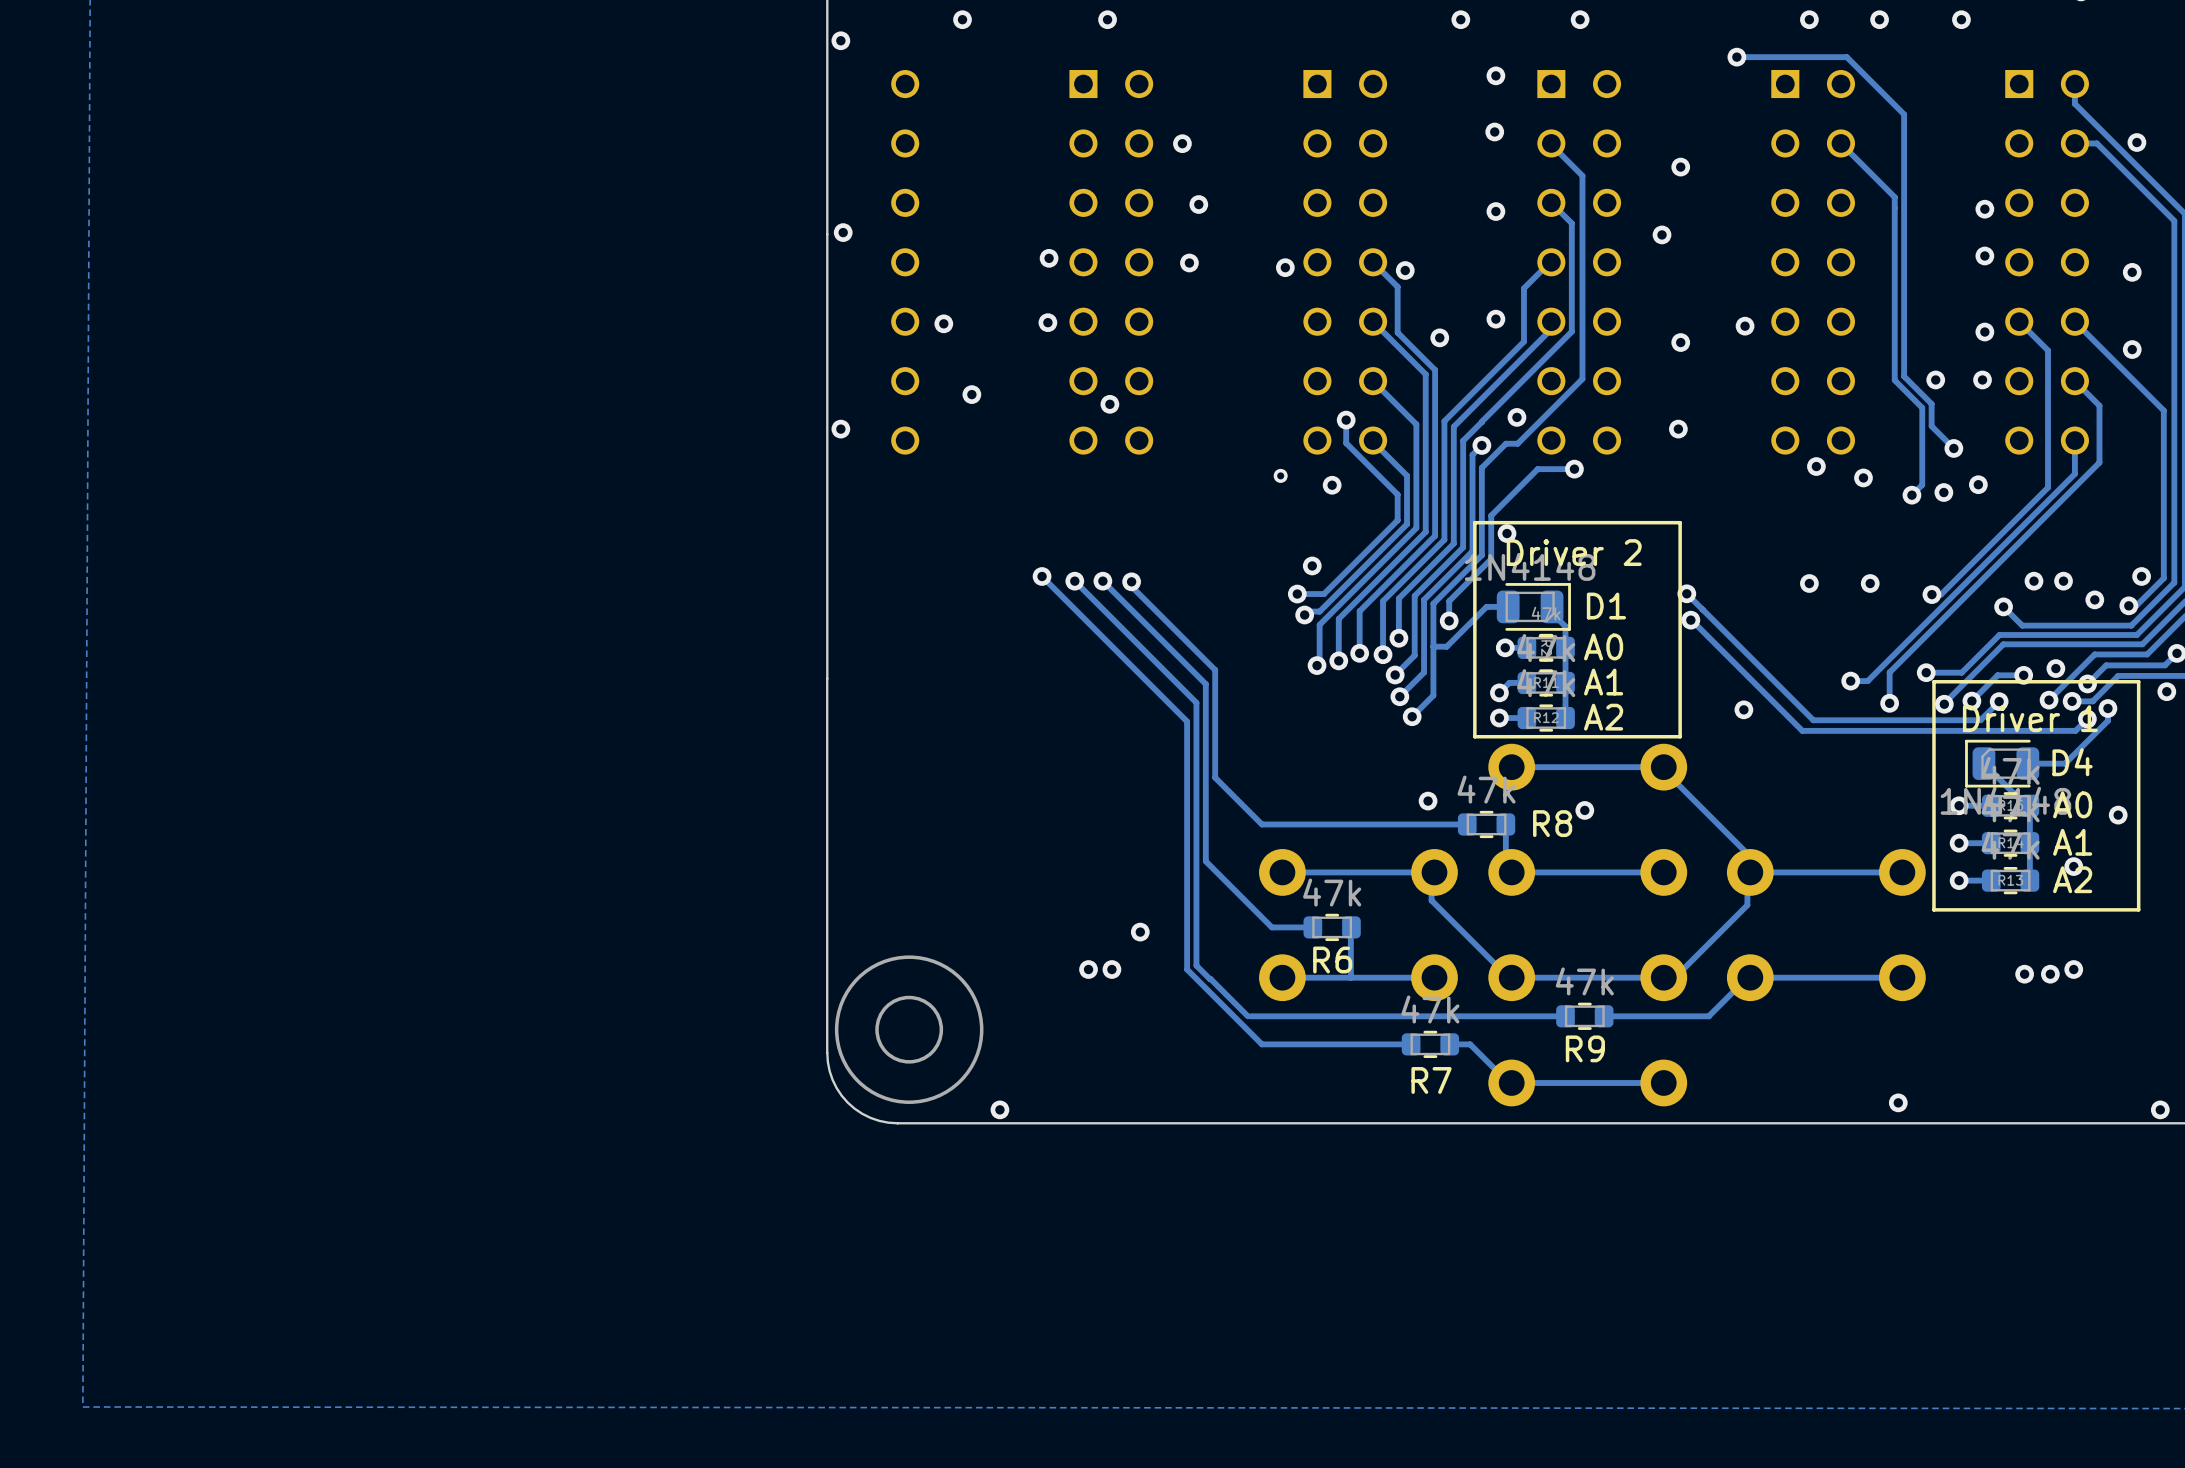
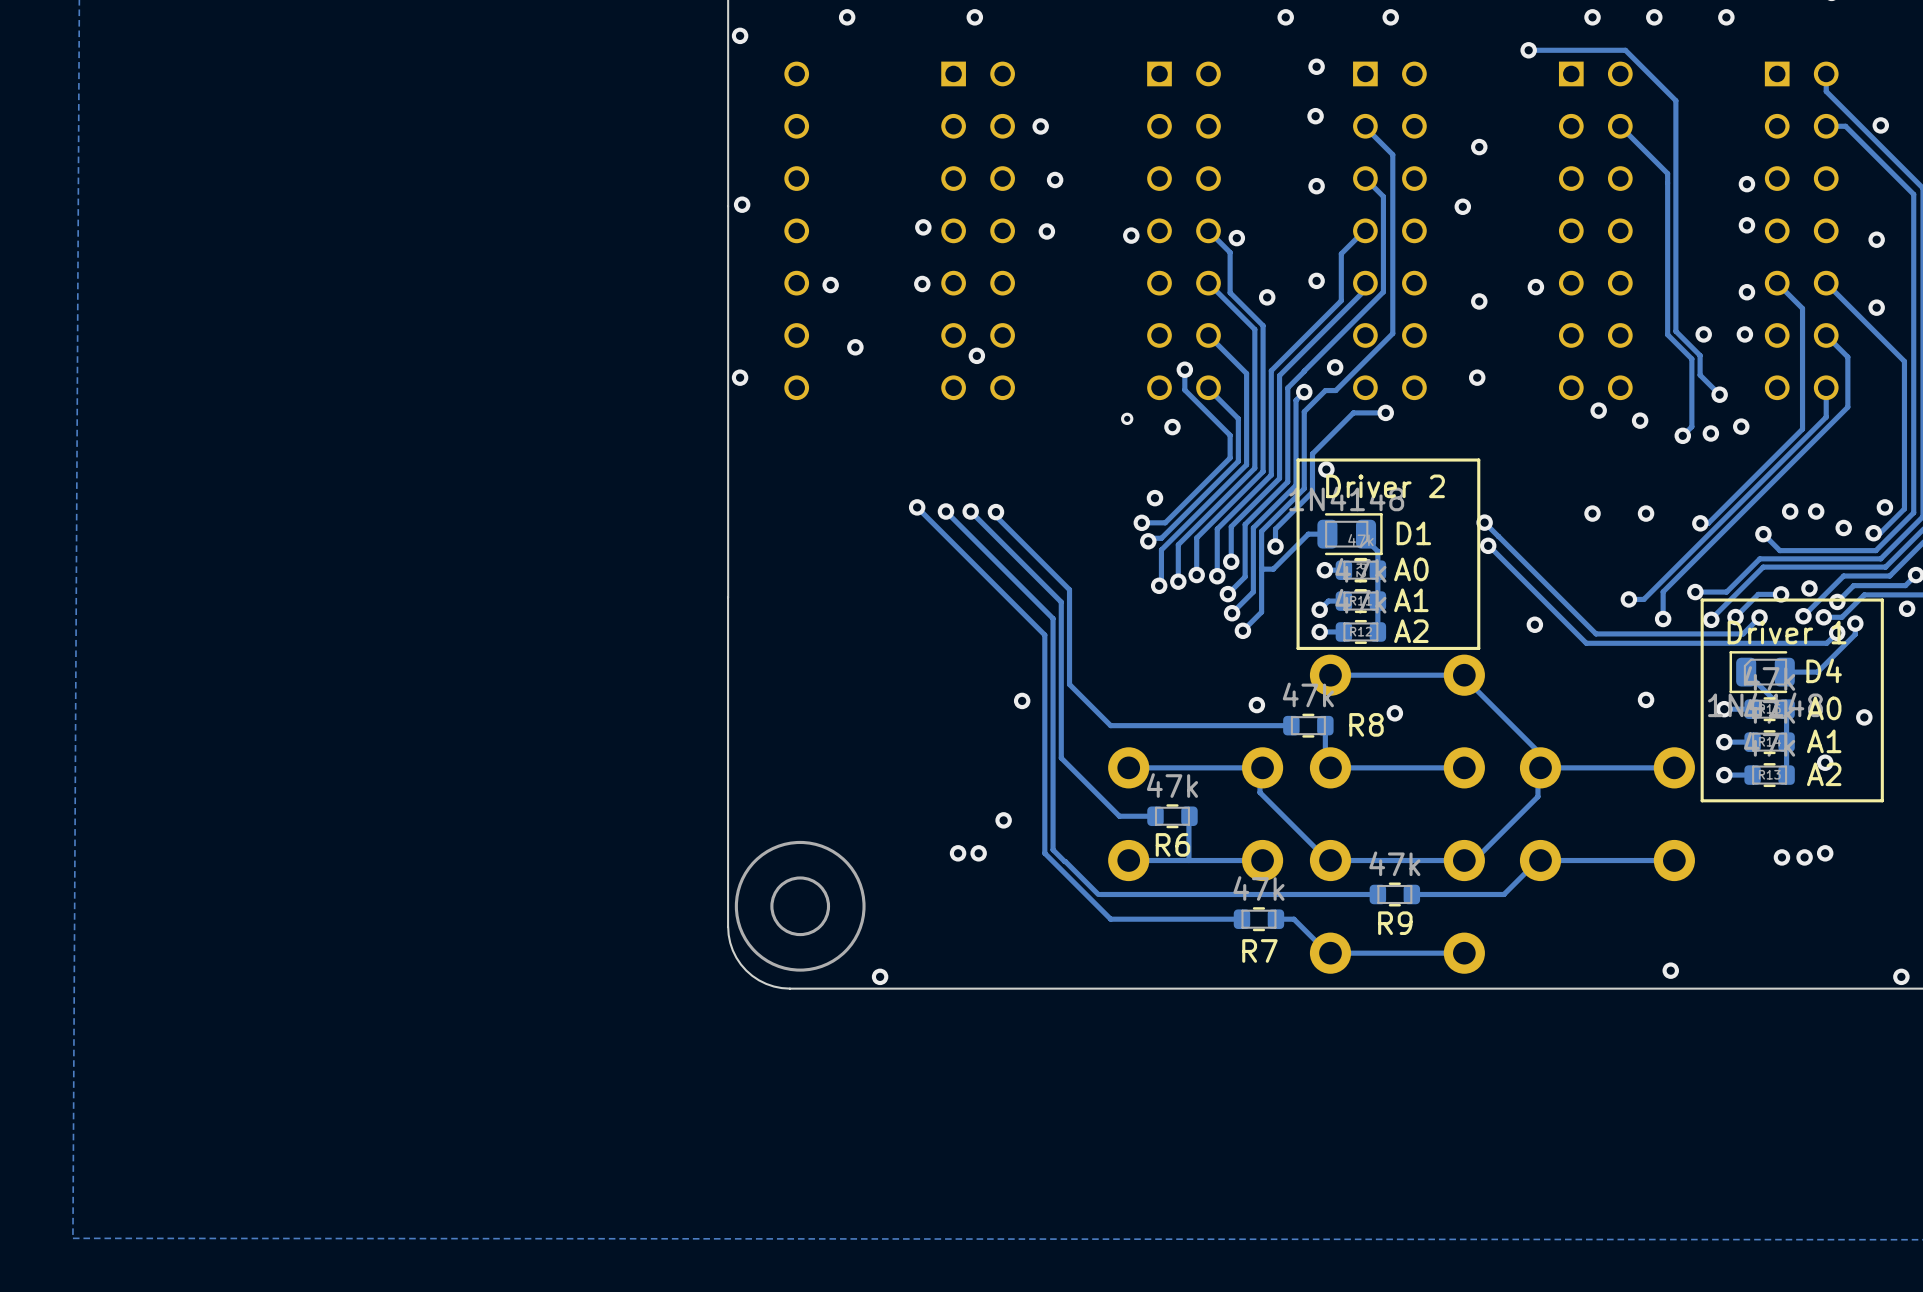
via: none -> (1646, 699)
via: none -> (1022, 700)

